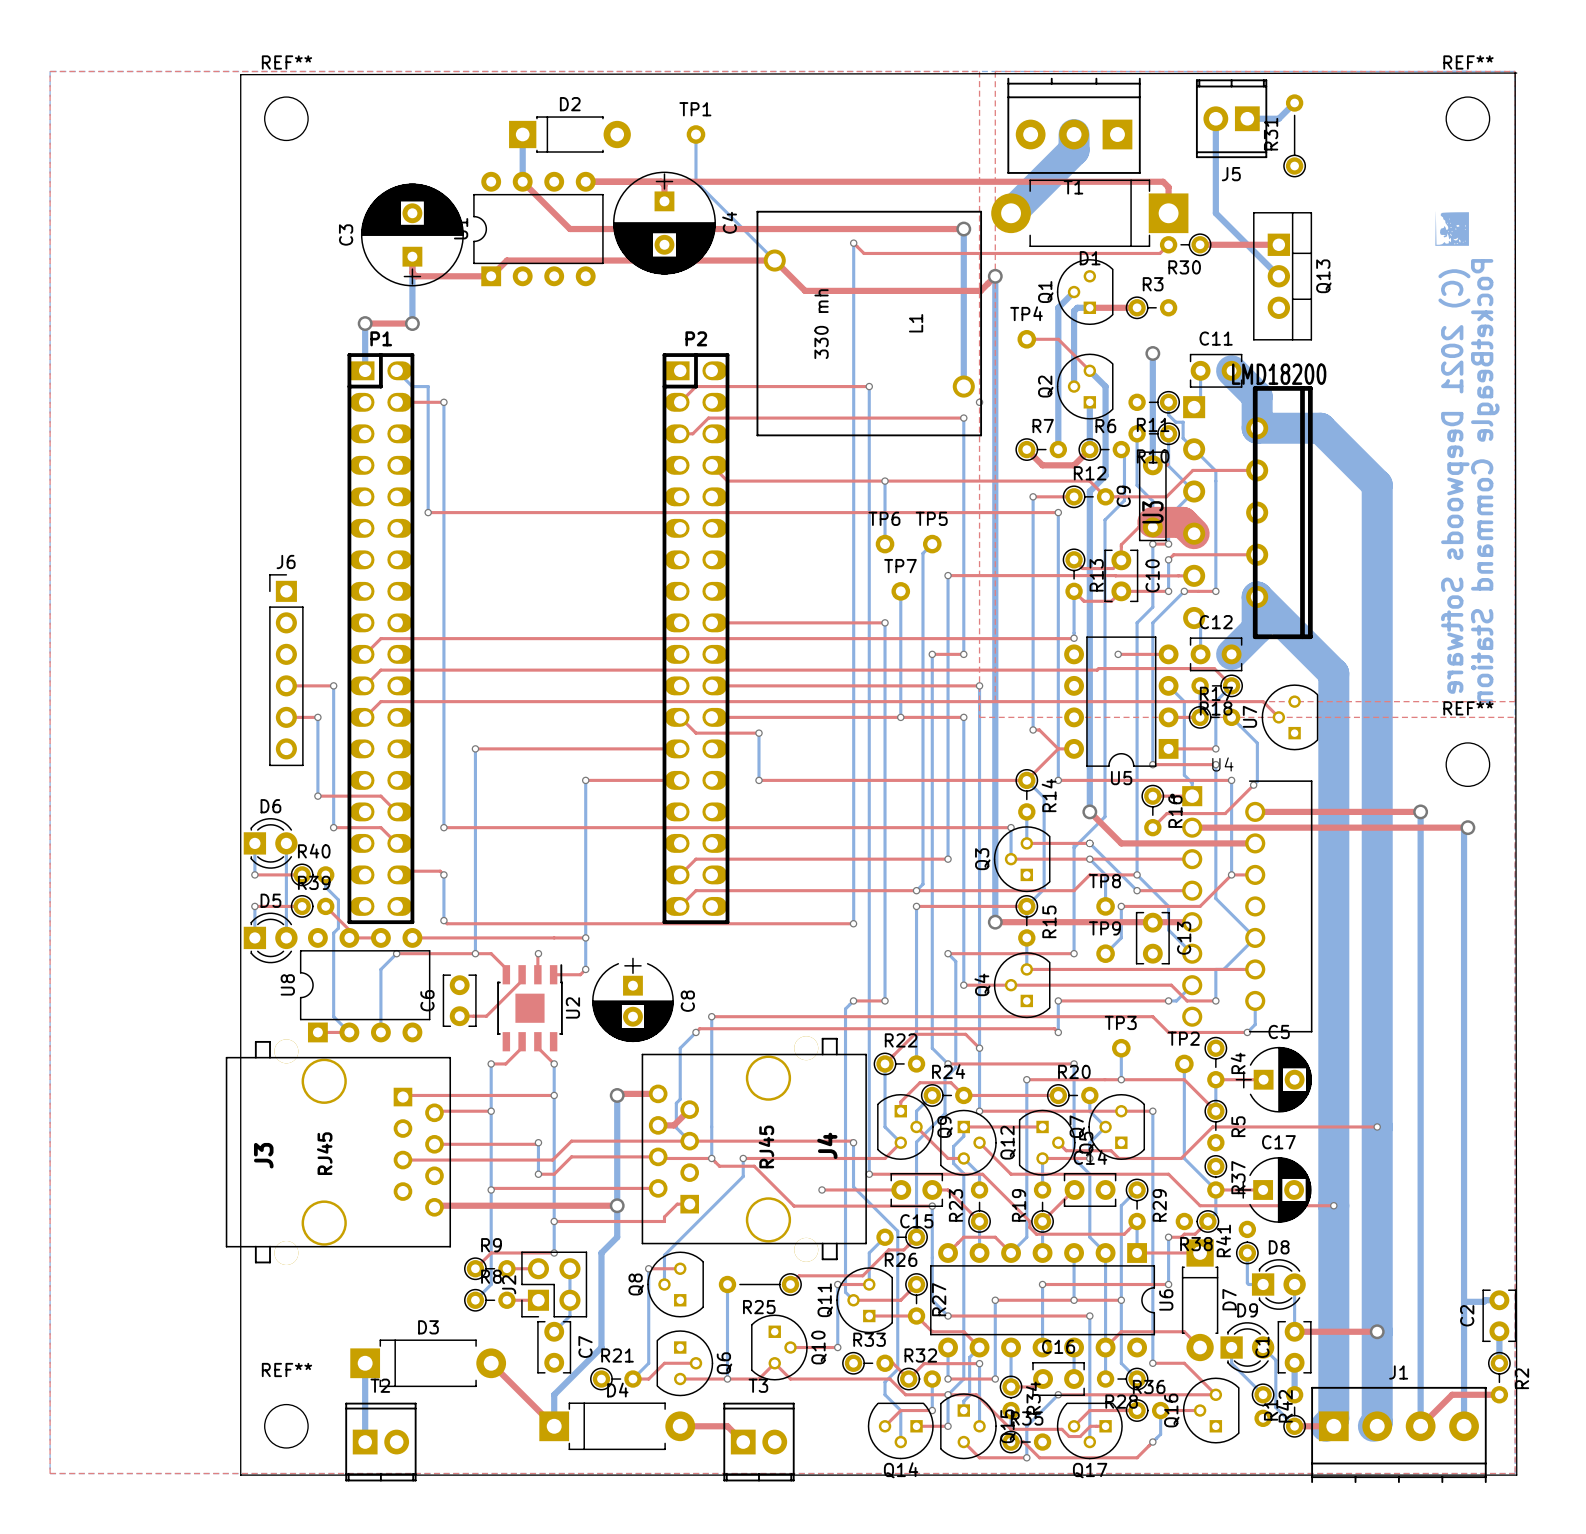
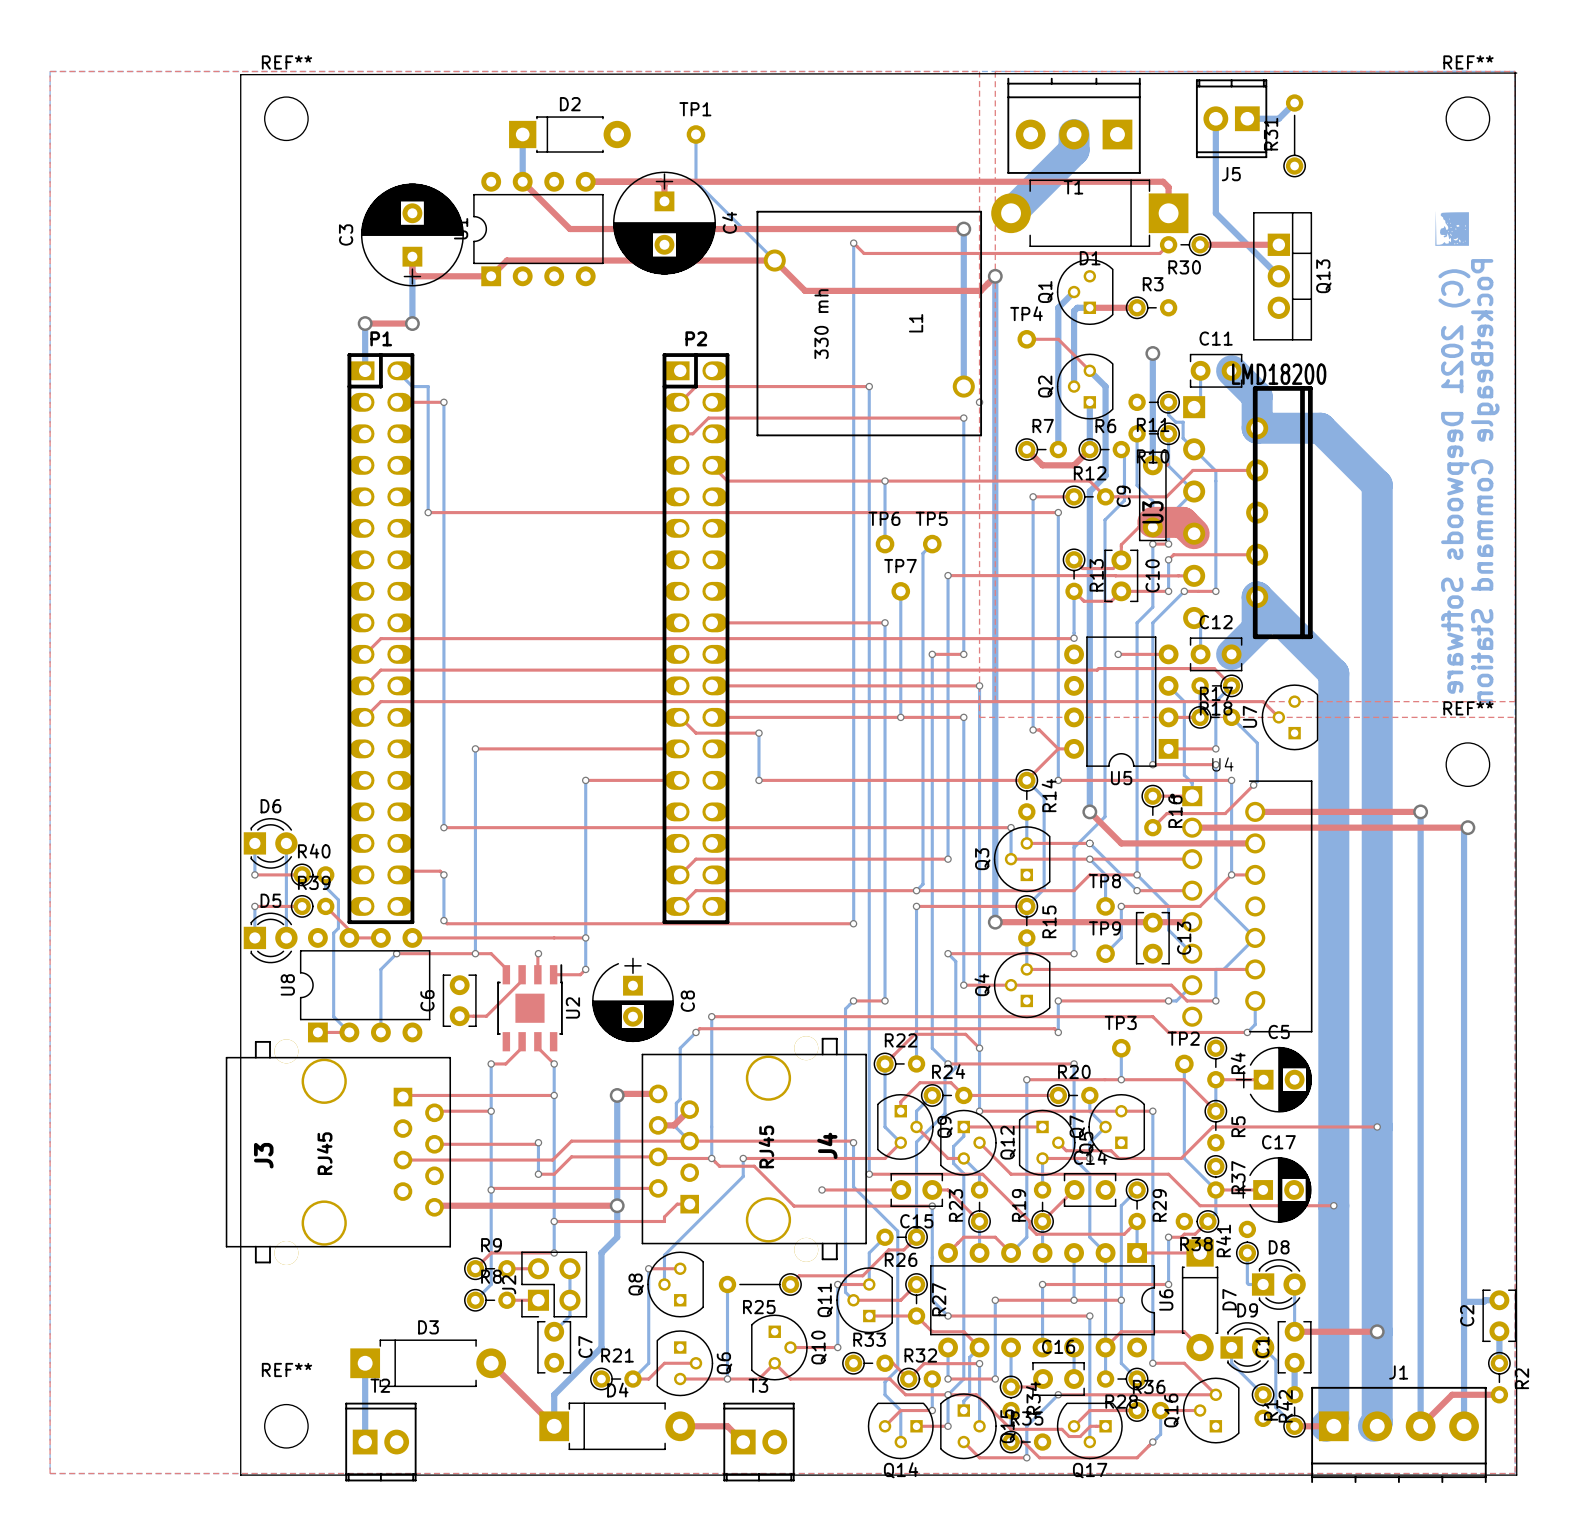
J6: (286, 670) -> none
top track: (286, 685) (333, 685) -> none
bottom track: (333, 685) (333, 827) -> none
via: (333, 685) -> none
top track: (286, 717) (317, 717) -> none
bottom track: (317, 717) (317, 796) -> none
via: (317, 717) -> none
top track: (317, 796) (380, 796) (396, 811) -> none
via: (317, 796) -> none
top track: (333, 827) (380, 827) (396, 843) -> none
via: (333, 827) -> none

